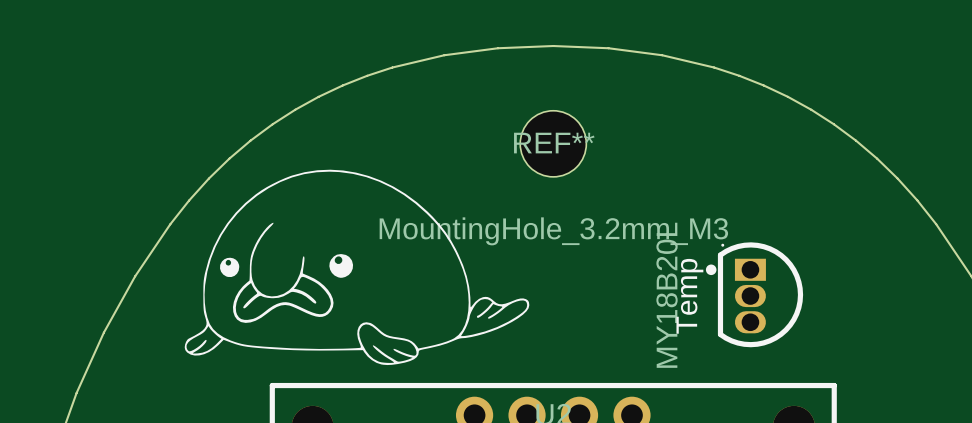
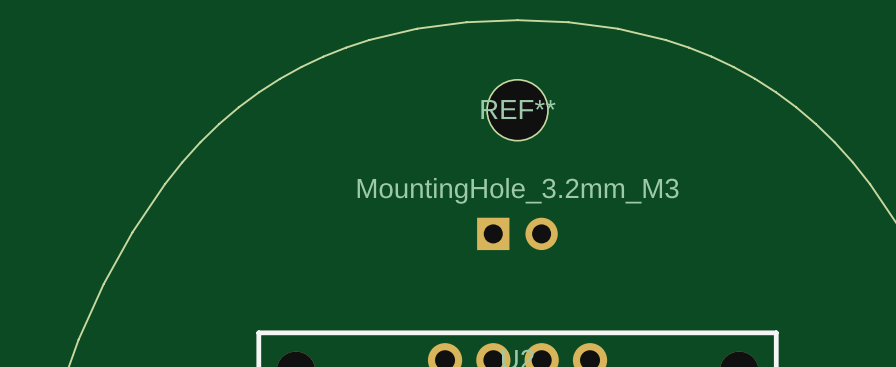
drawing: [184, 169, 530, 366] -> none
part: none -> (517, 233)
Temp: MY18B20L (754, 294) -> none

